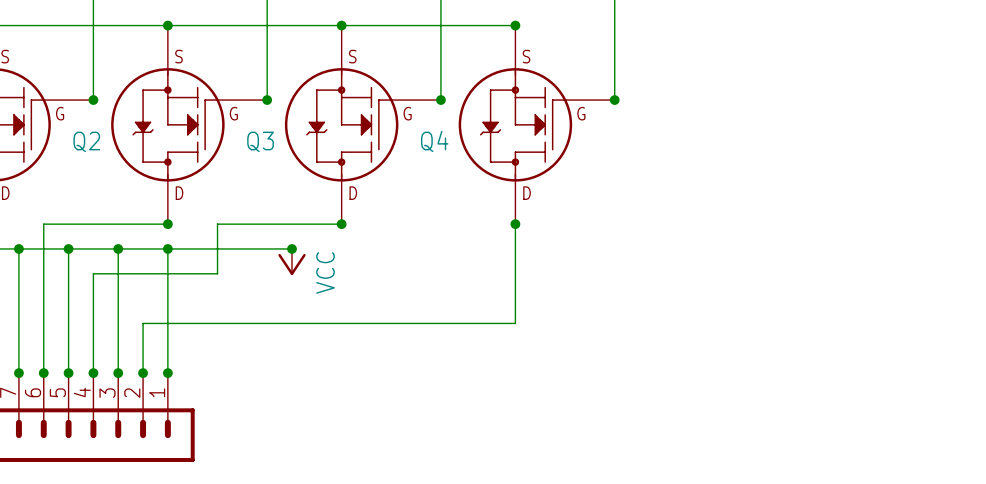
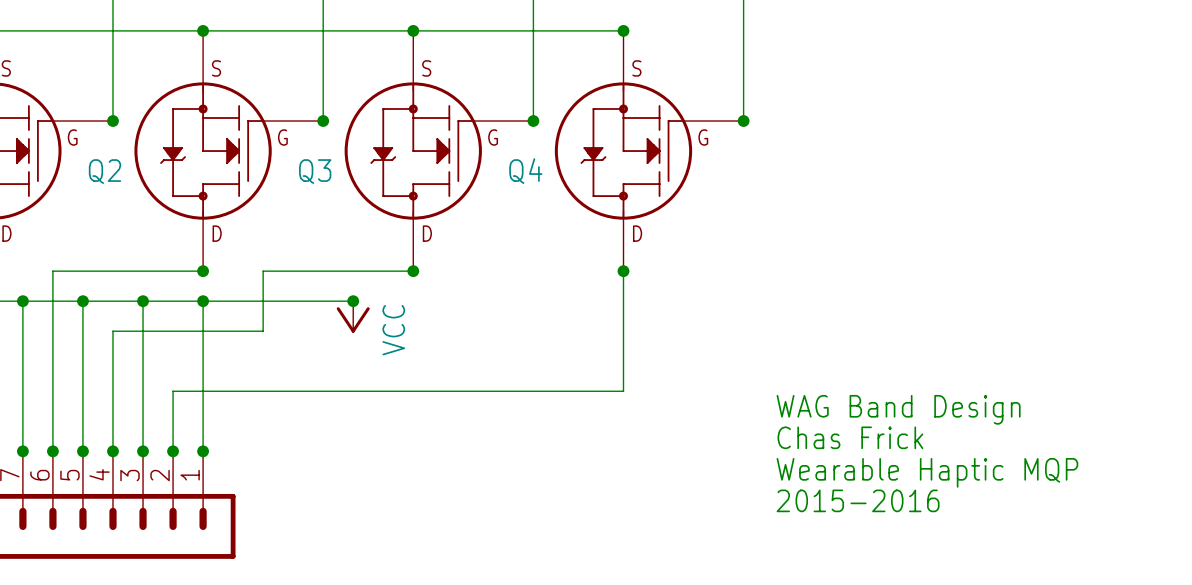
text: none -> WAG Band Design (898, 409)
text: none -> Chas Frick (850, 437)
text: none -> Wearable Haptic MQP (927, 472)
text: none -> 2015-2016 (858, 500)

